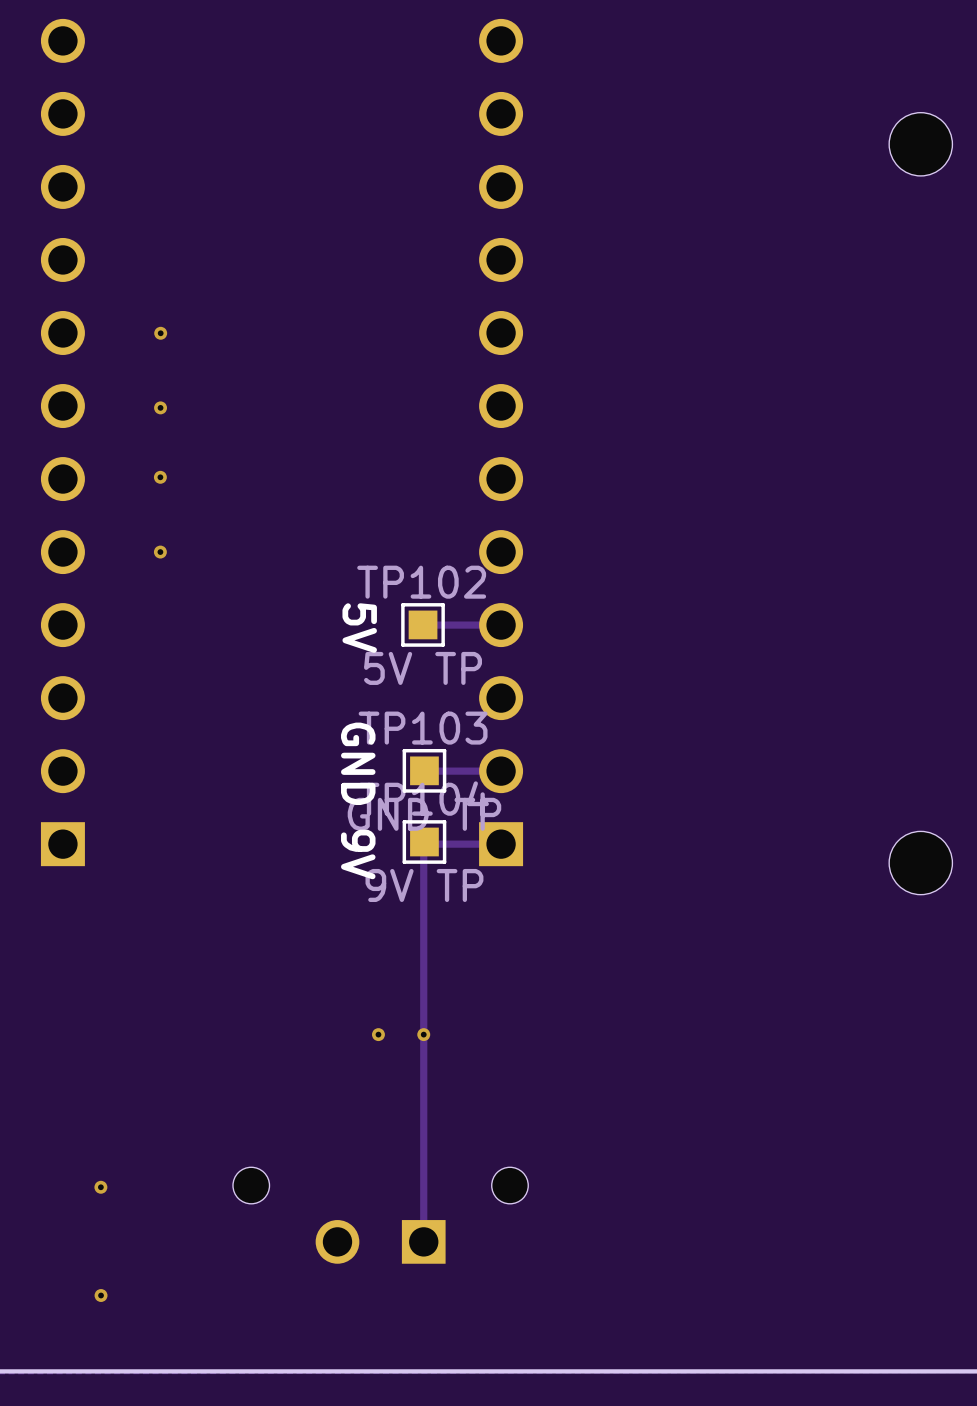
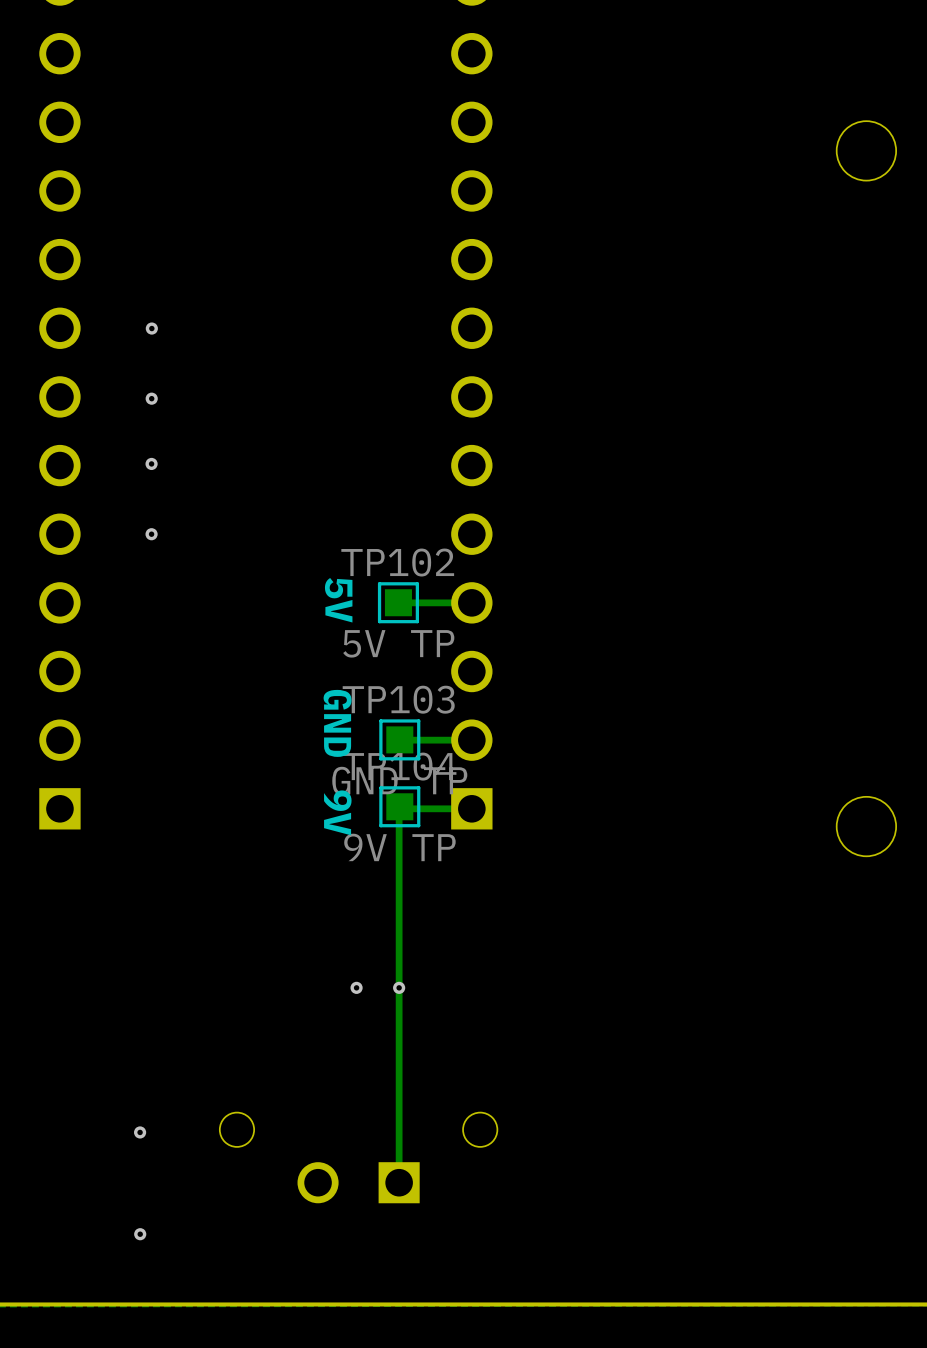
via position: (100, 1187) -> (140, 1132)
via position: (101, 1295) -> (140, 1234)

